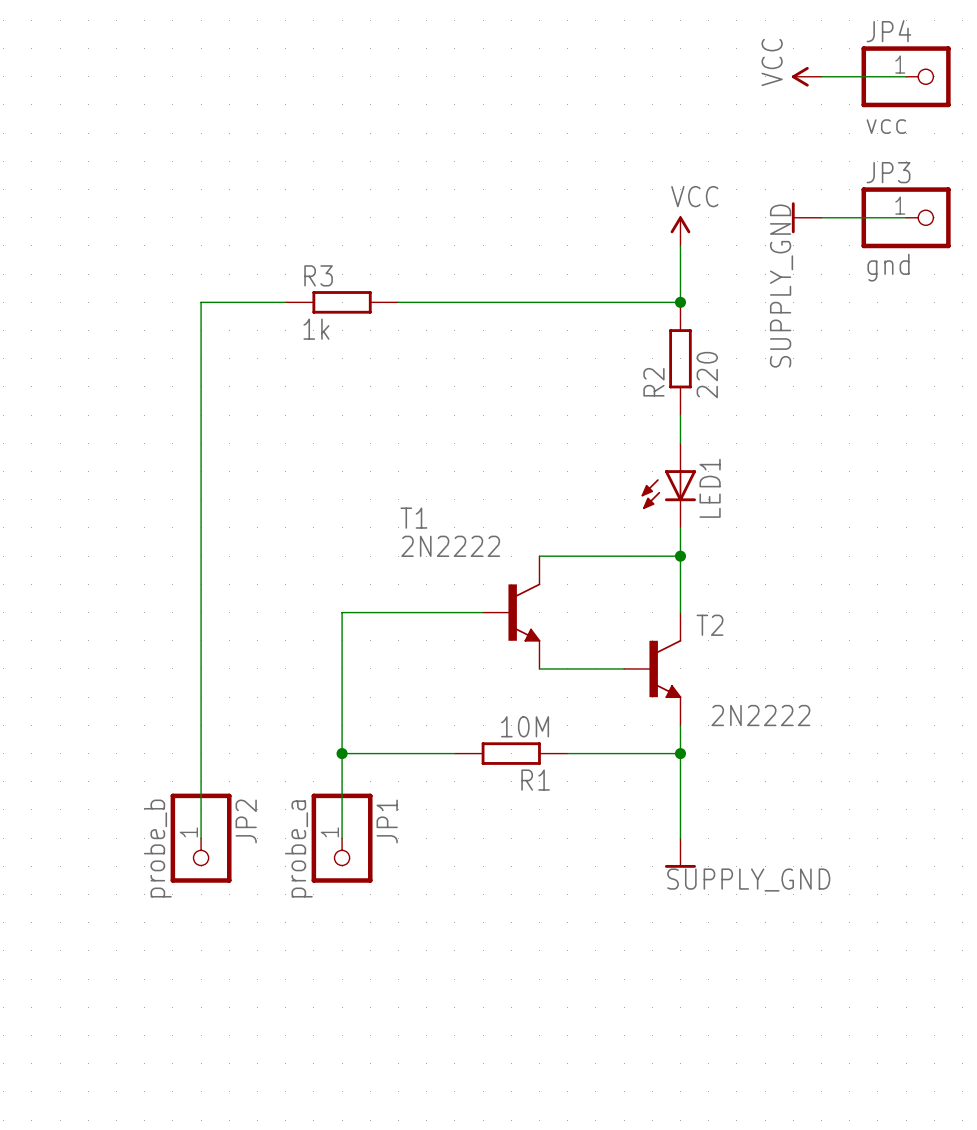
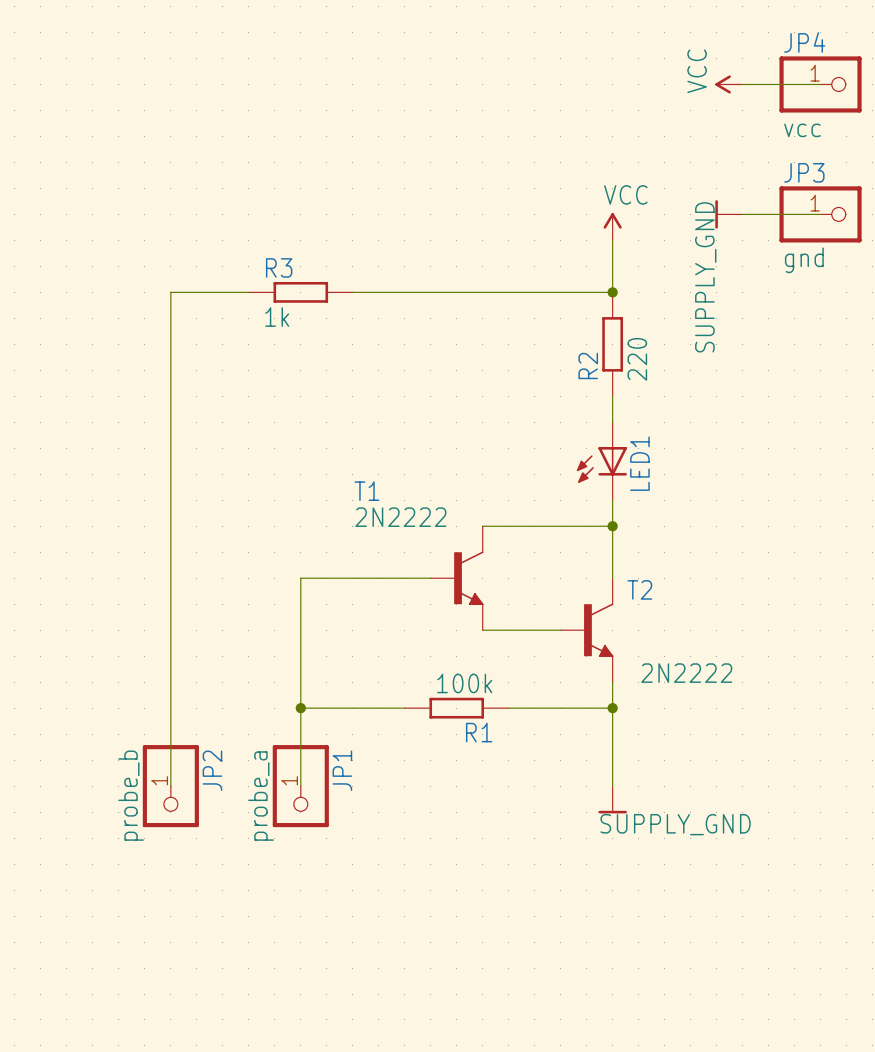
R1 value: 10M (525, 726) -> 100k (464, 683)

